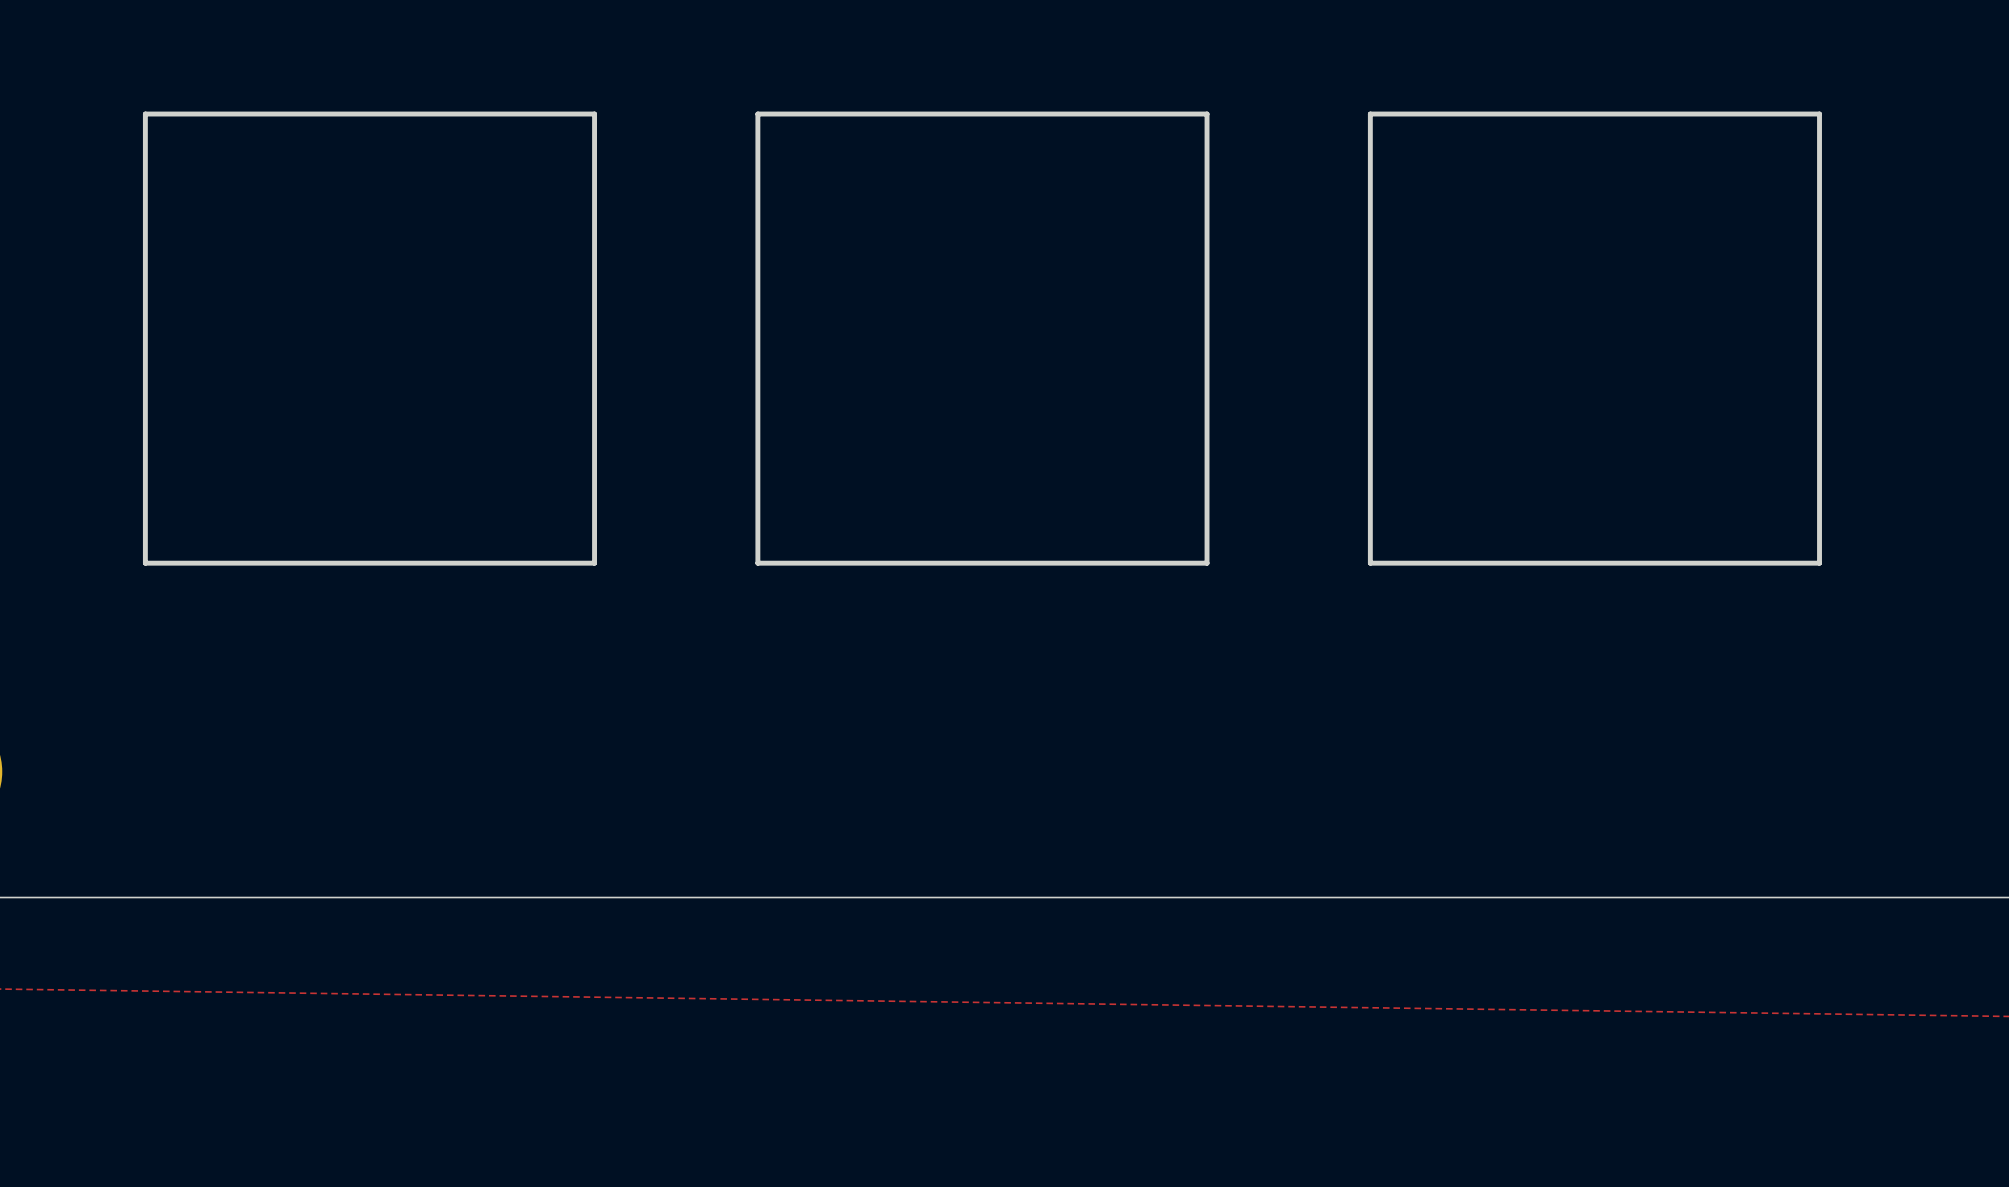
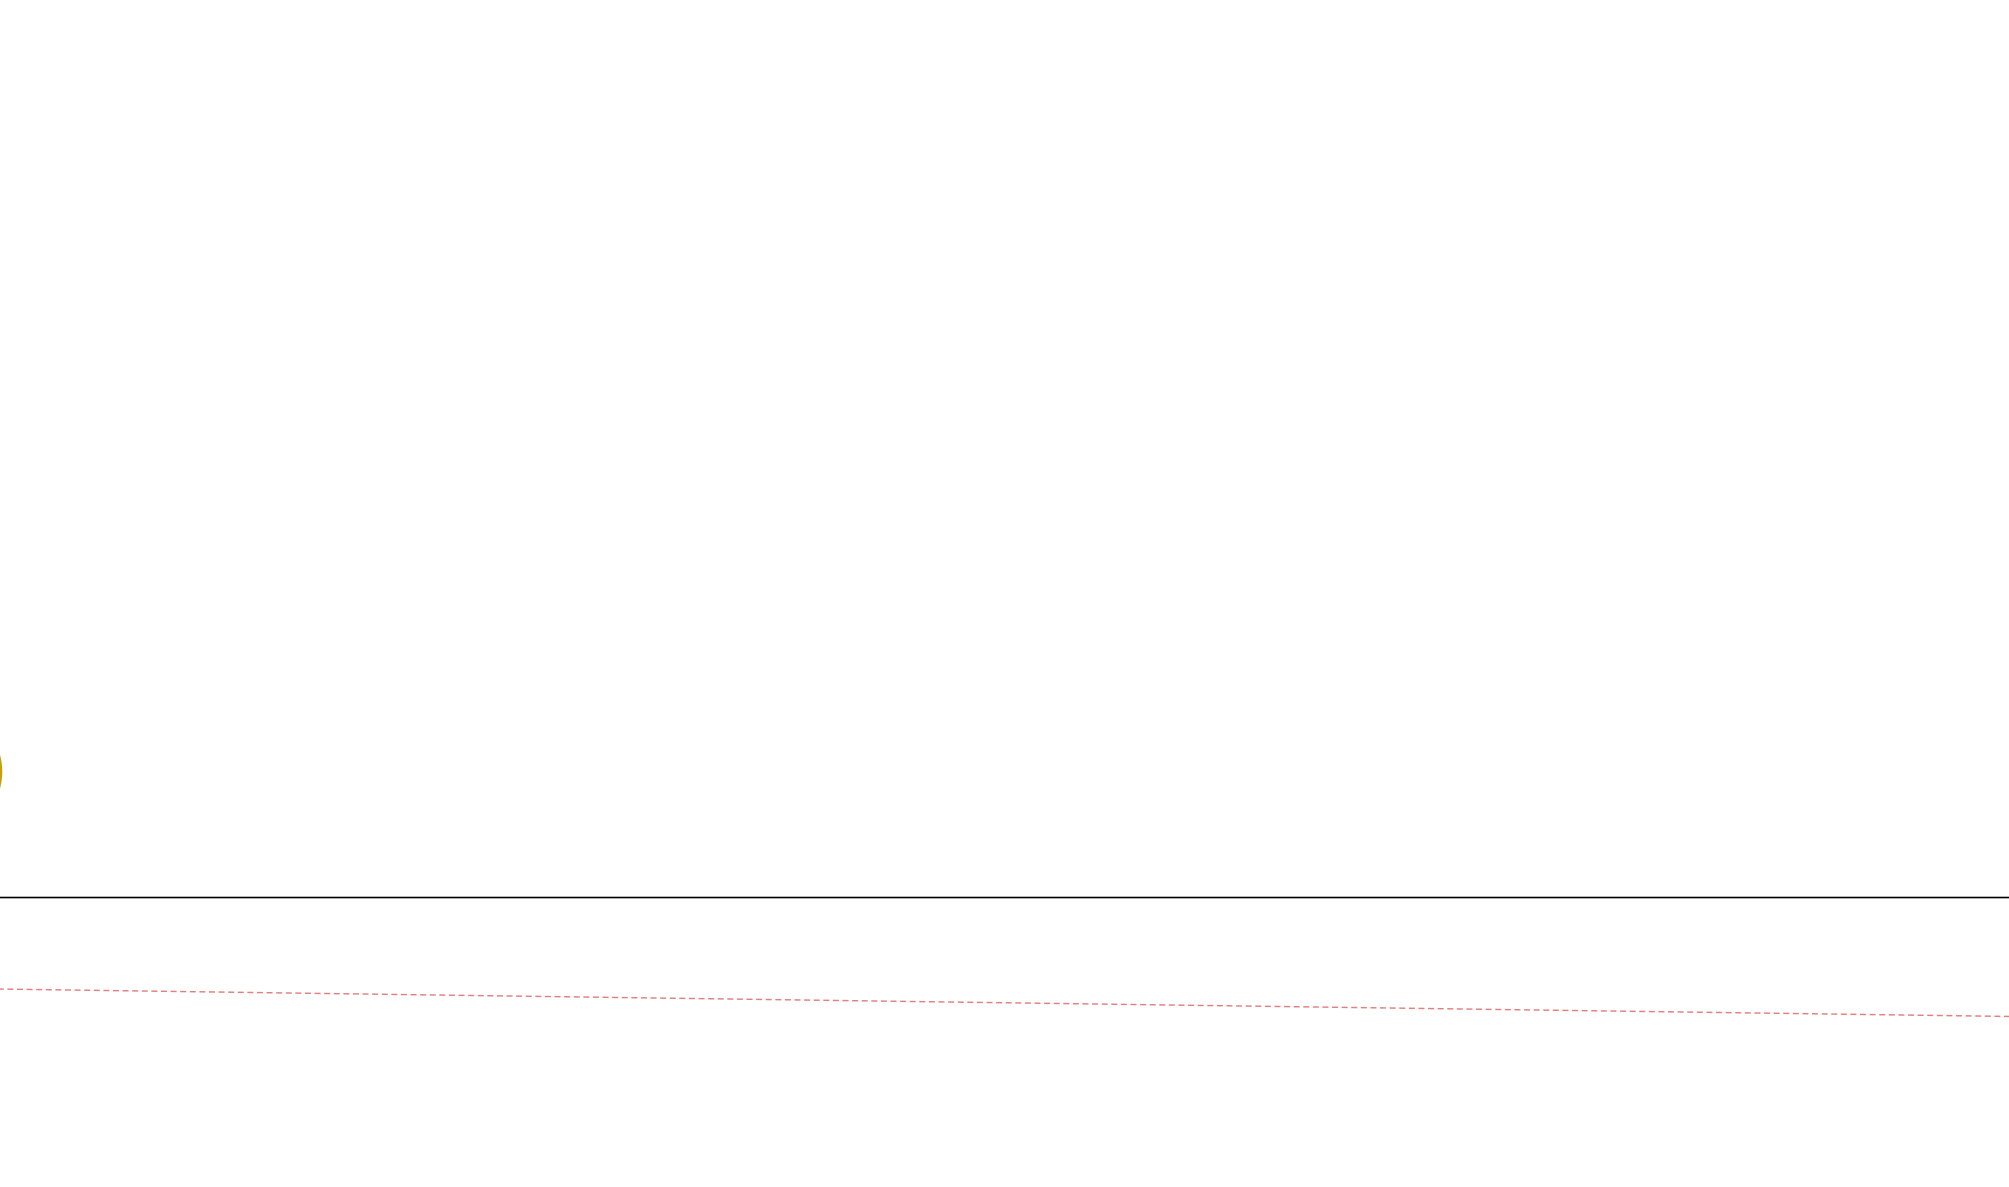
drawing: [142, 111, 597, 566] -> none
drawing: [755, 111, 1210, 566] -> none
drawing: [1367, 111, 1822, 566] -> none

